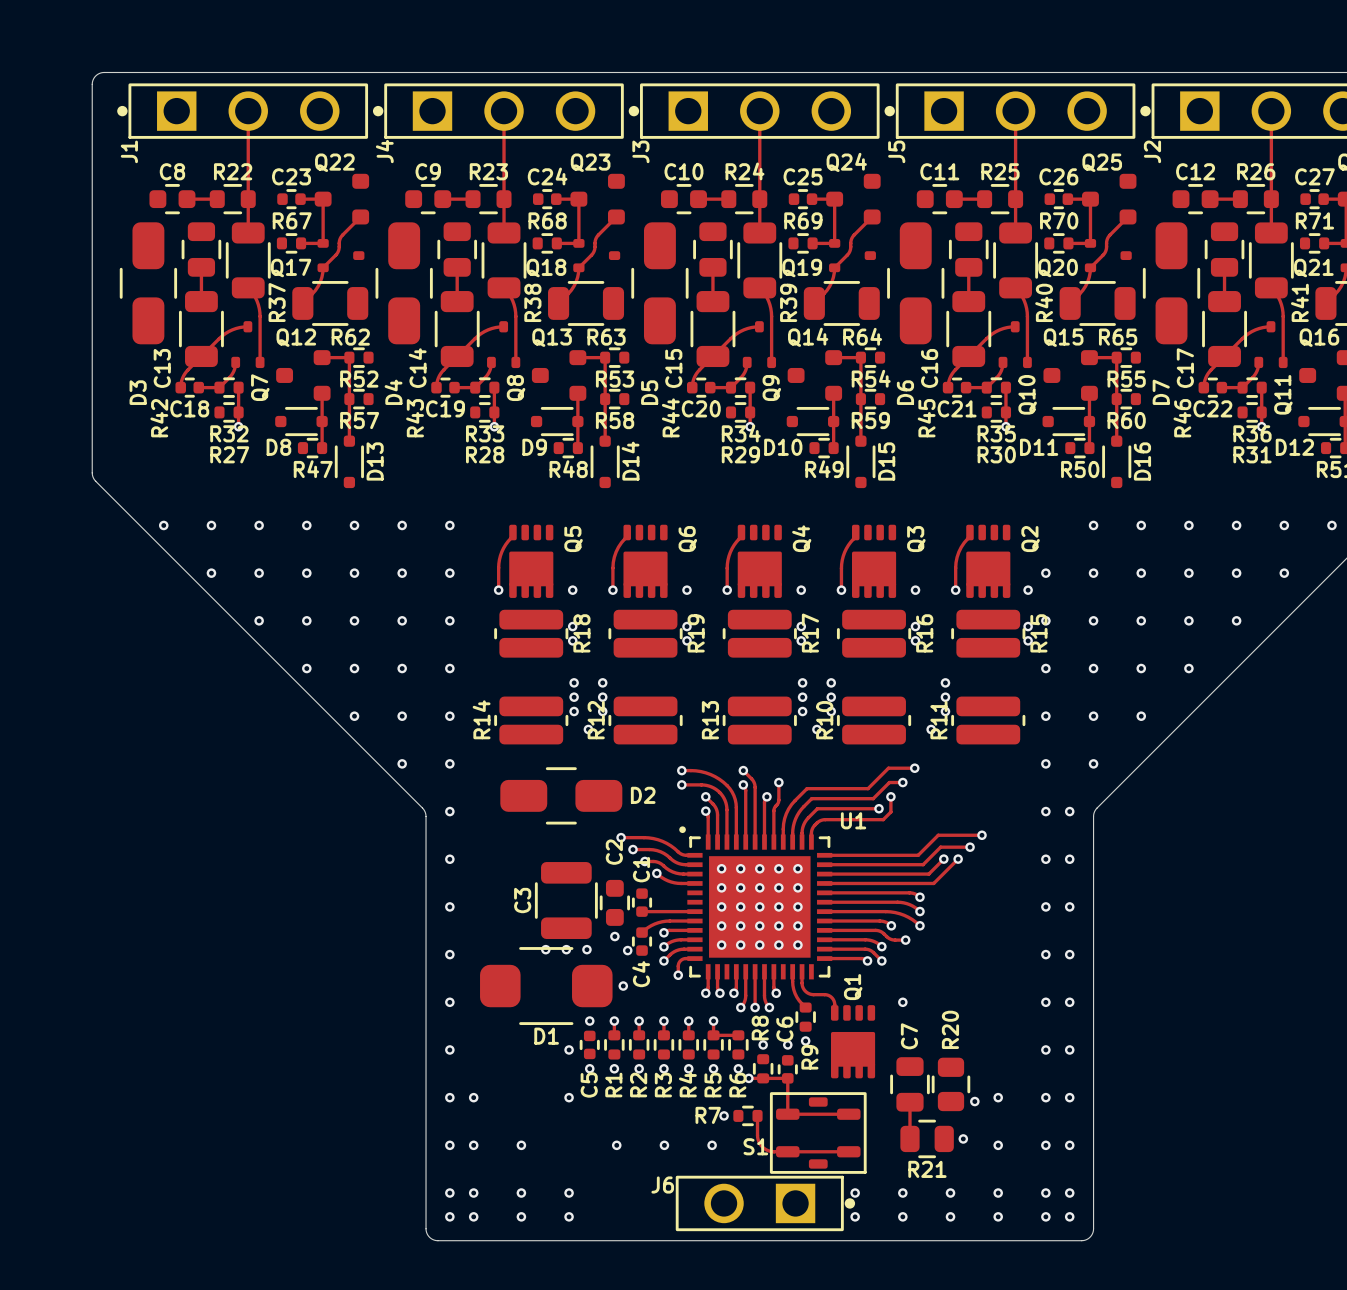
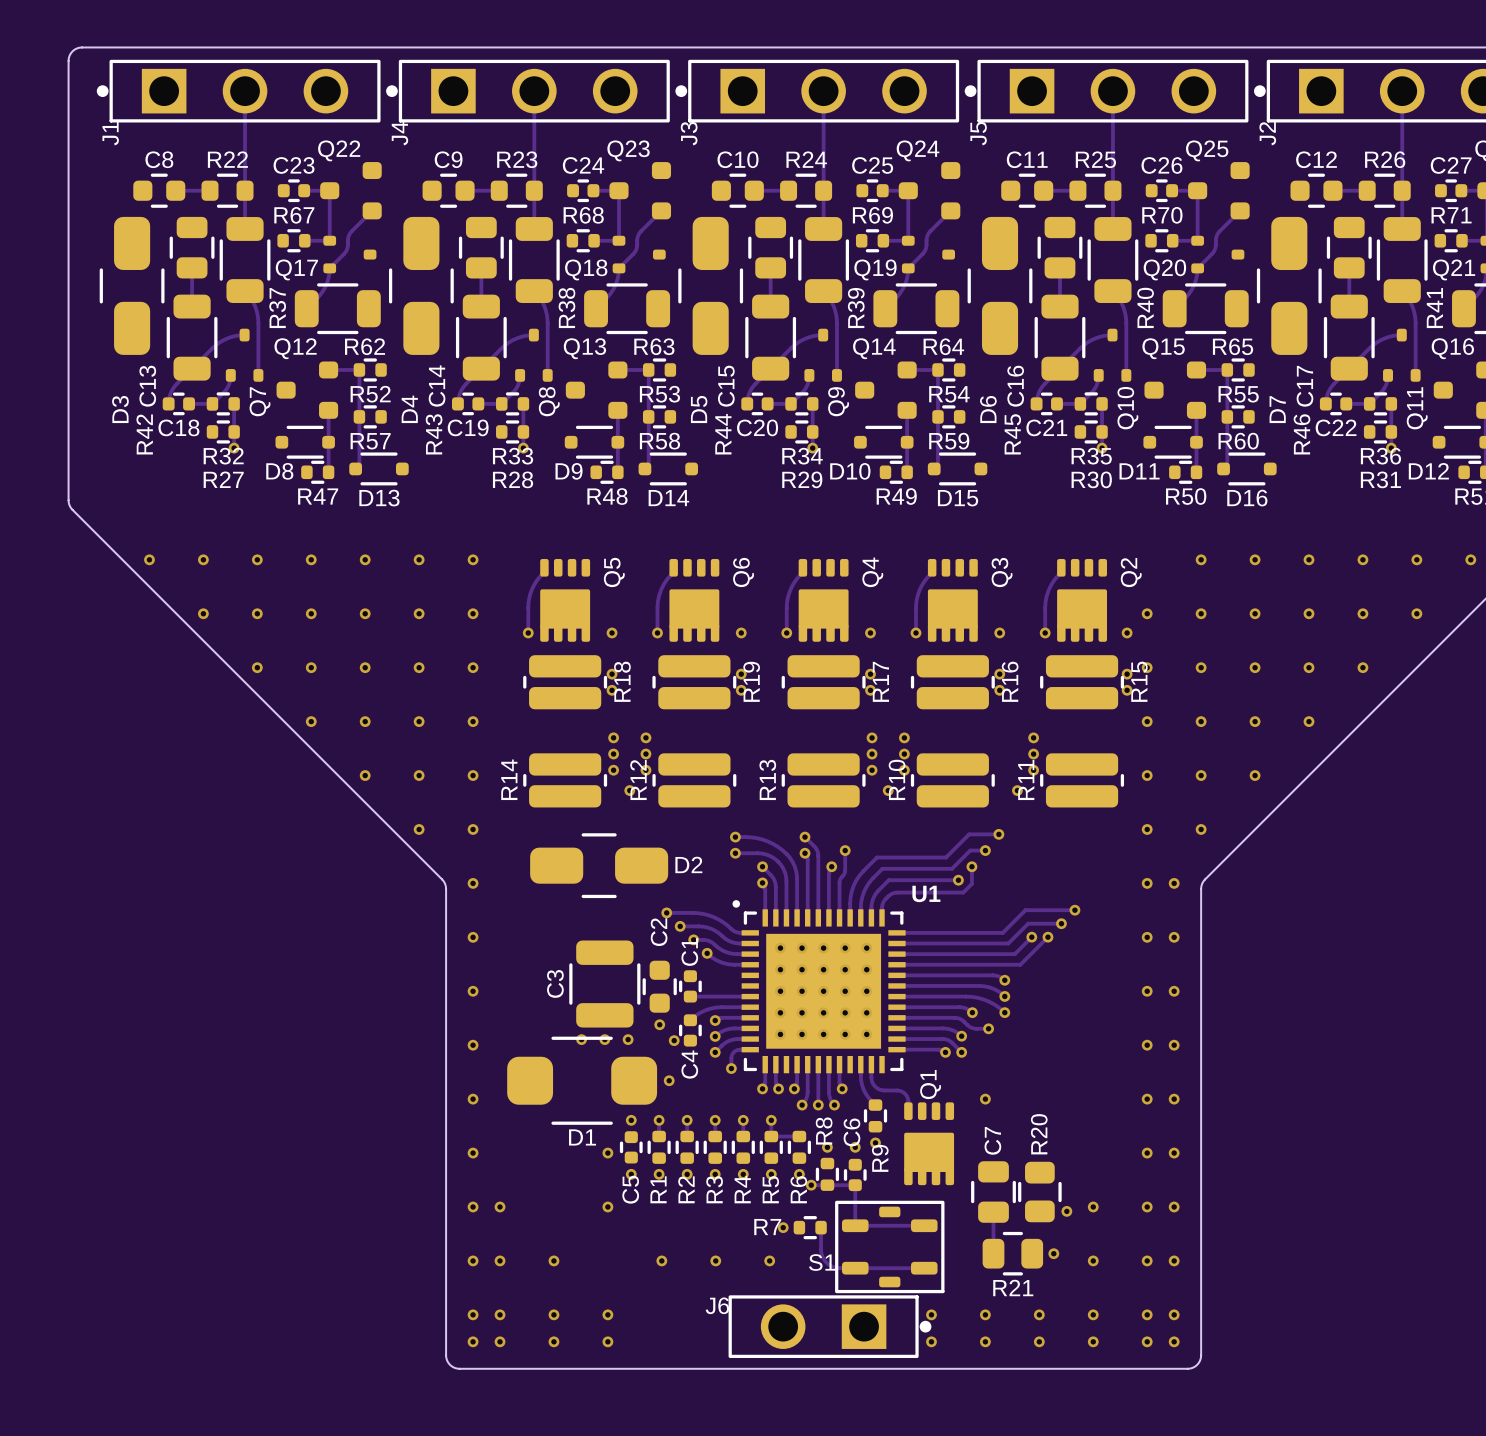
D13 rotation: 0° (349, 461) -> 90° clockwise (379, 468)
D14 rotation: 0° (605, 461) -> 90° clockwise (668, 468)
D15 rotation: 0° (860, 461) -> 90° clockwise (957, 468)
D16 rotation: 0° (1116, 461) -> 90° clockwise (1246, 468)

